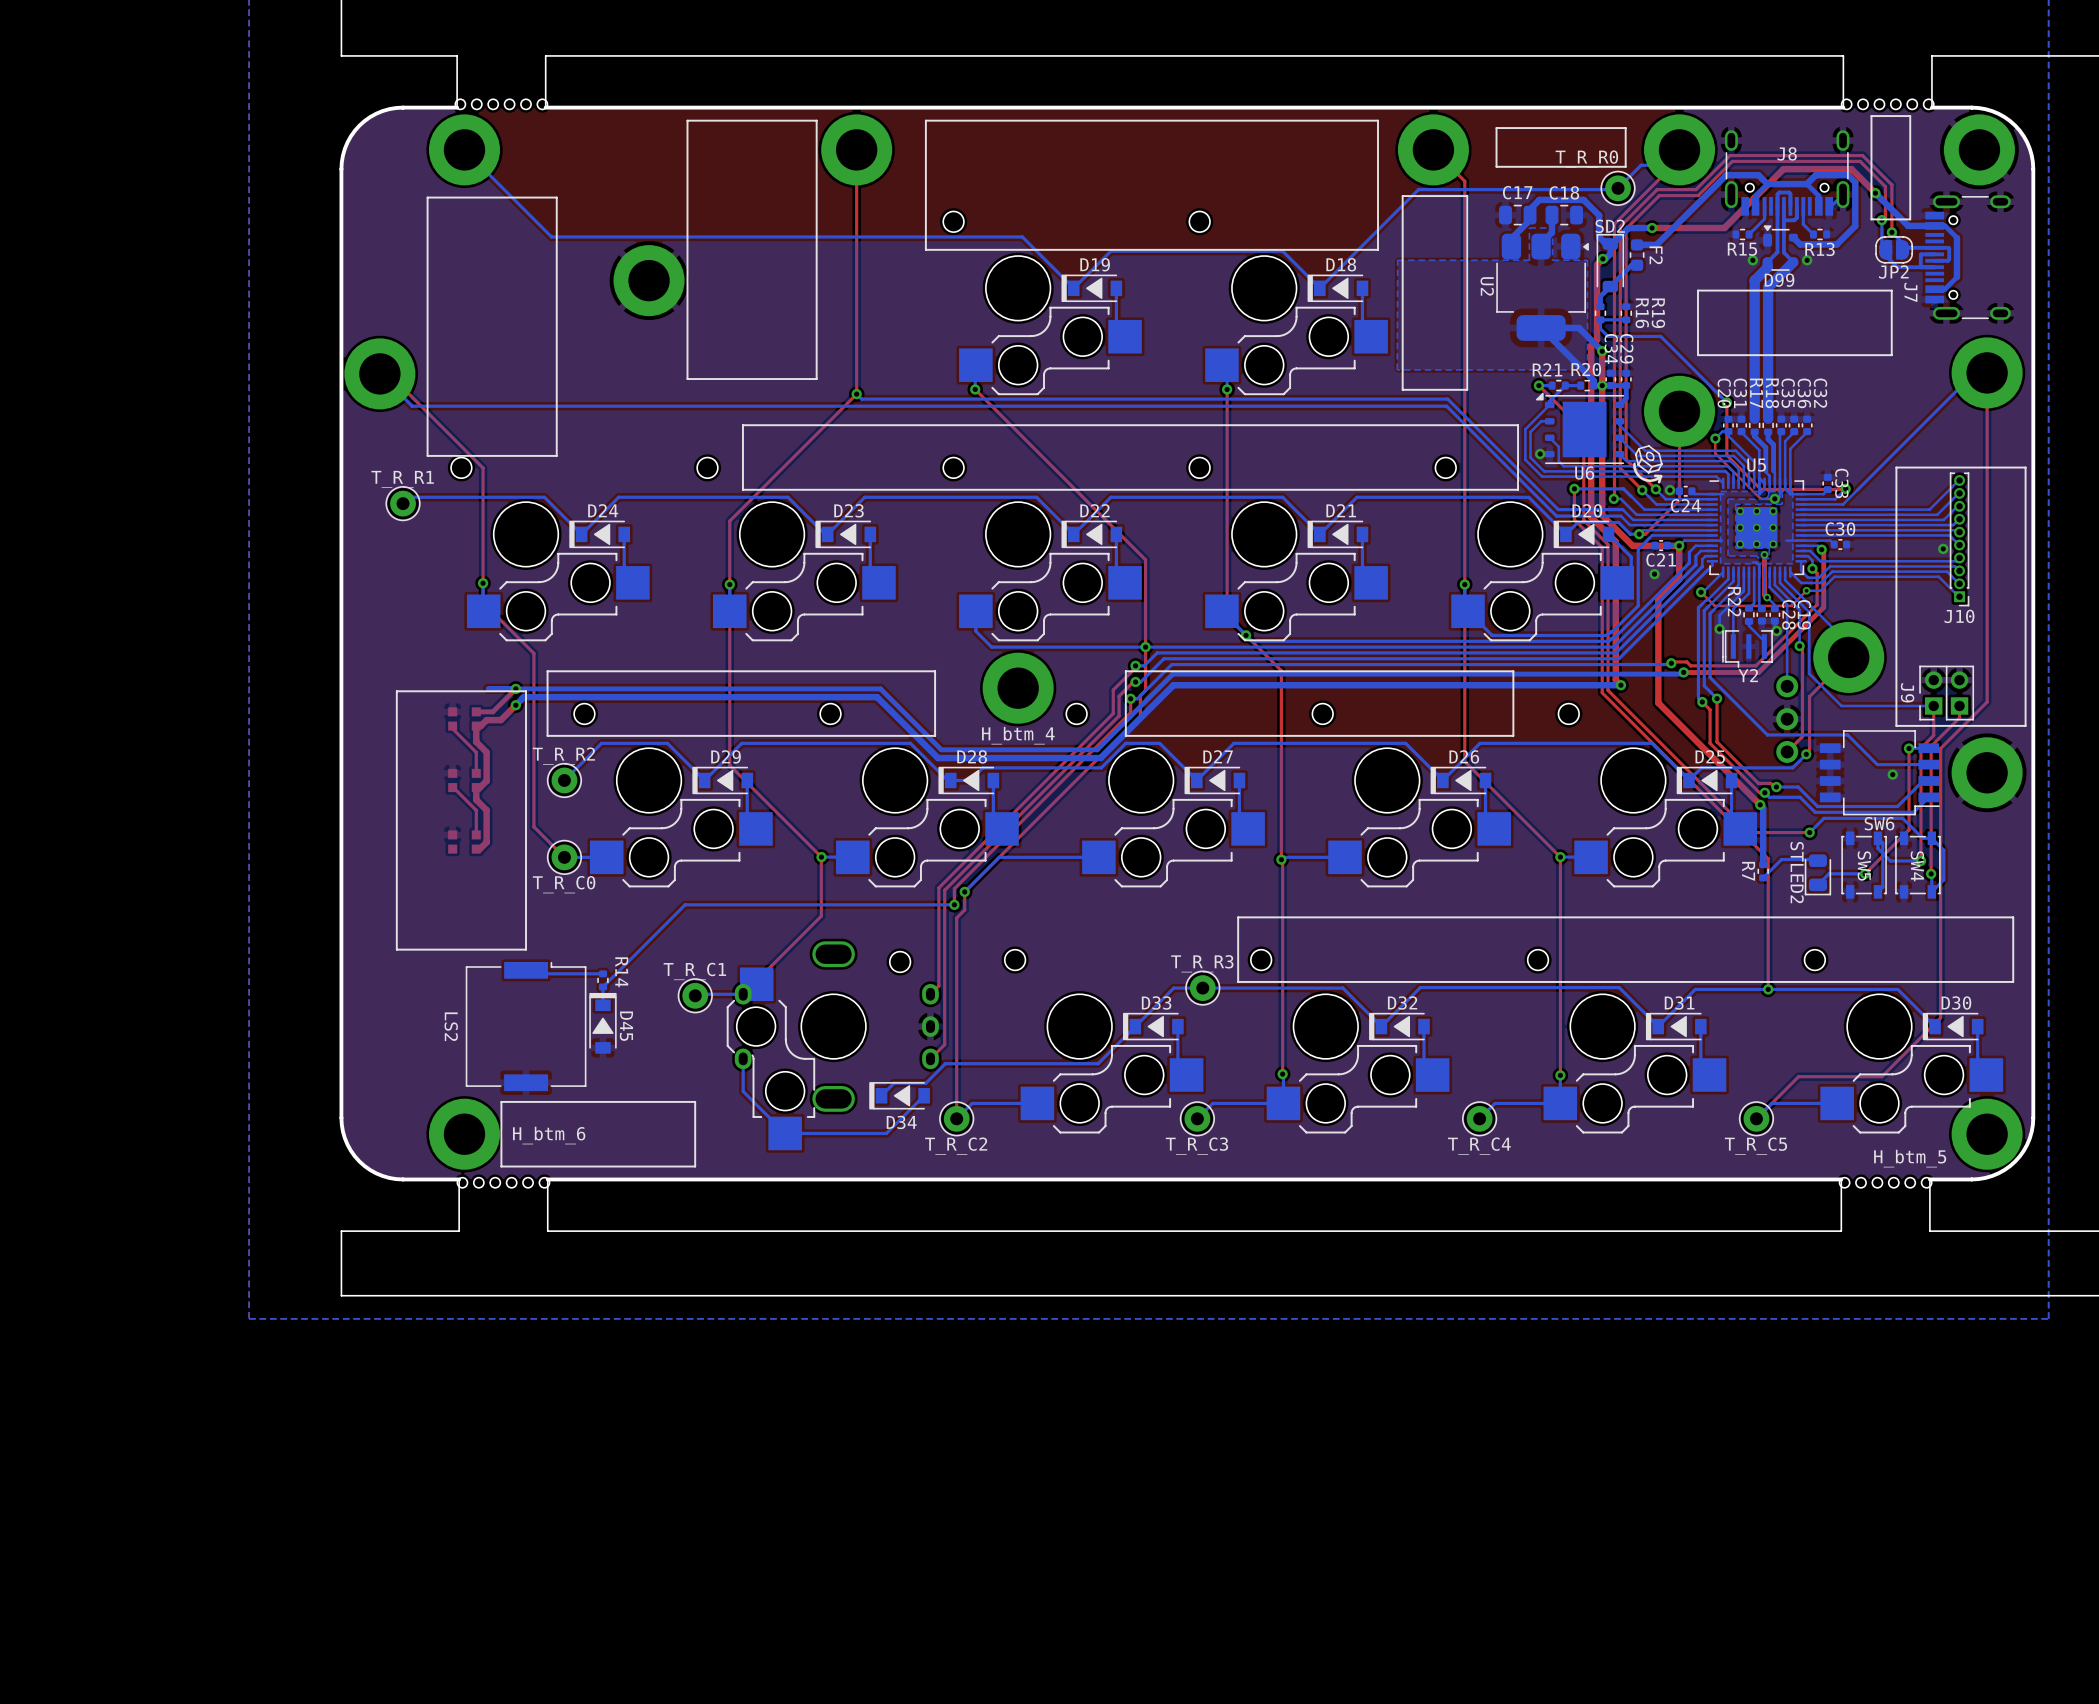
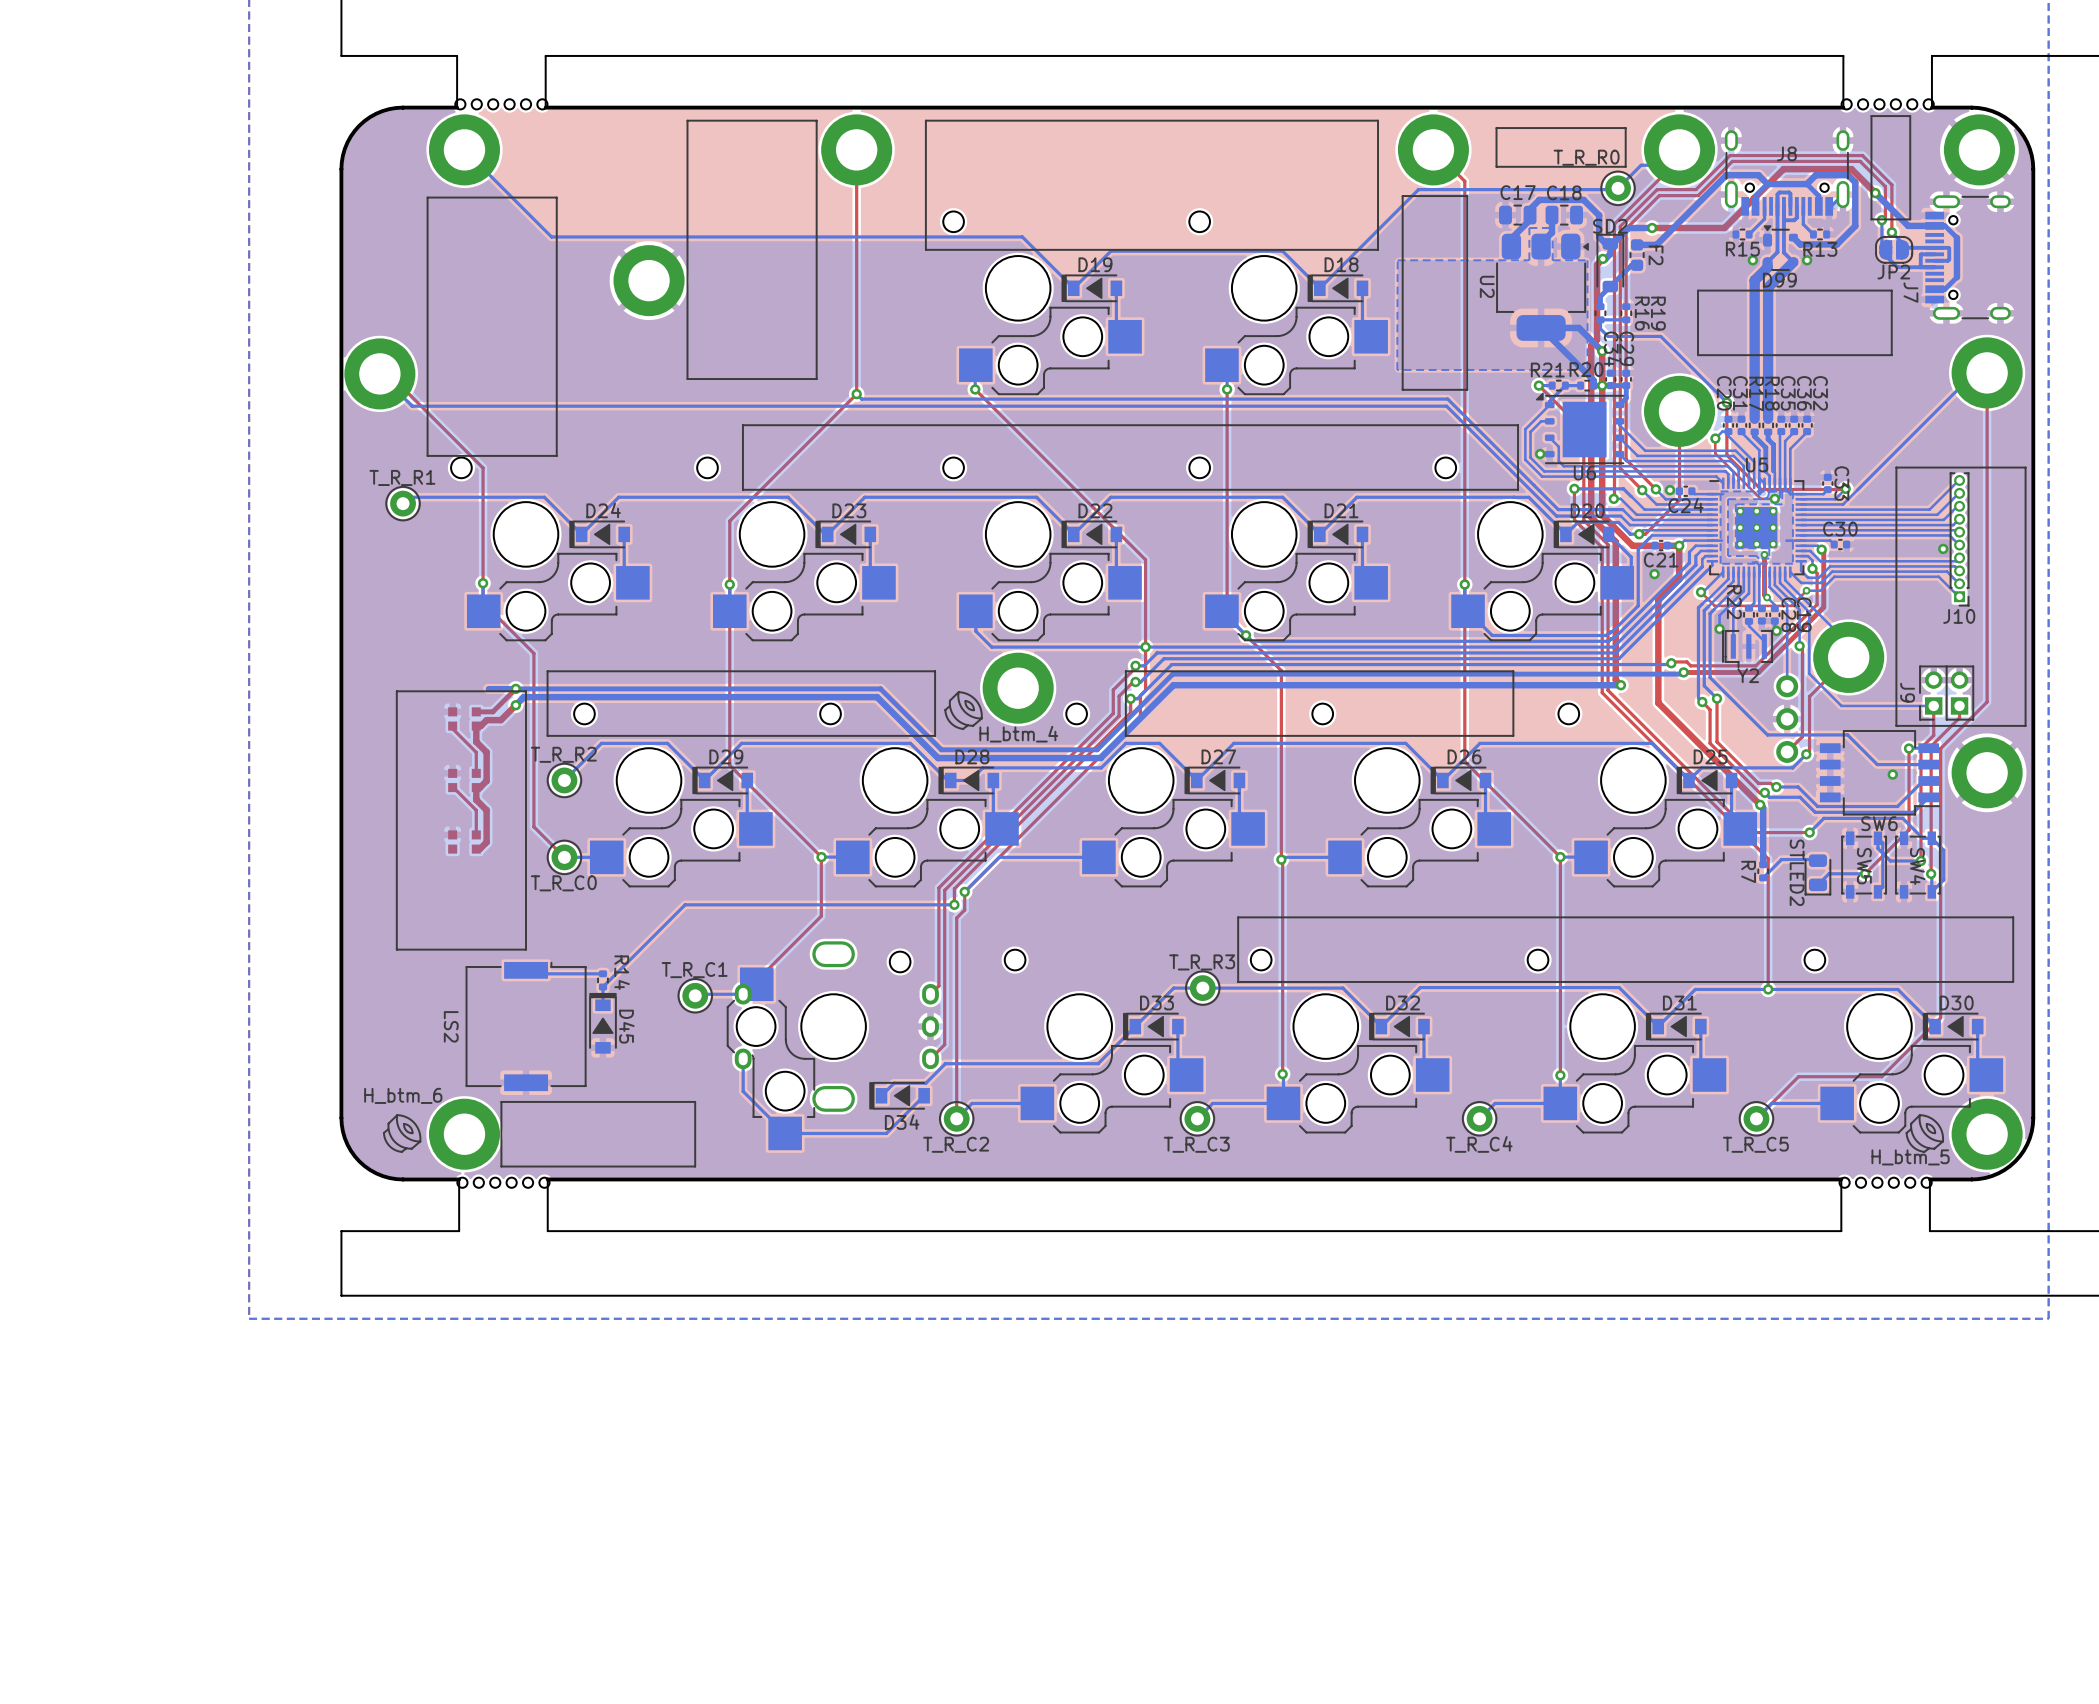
drawing: [1633, 445, 1663, 484] -> none
drawing: none -> [944, 691, 983, 730]
drawing: none -> [382, 1114, 422, 1153]
drawing: none -> [1905, 1114, 1945, 1153]
H_btm_6 name position: H_btm_6 (549, 1135) -> H_btm_6 (403, 1095)

